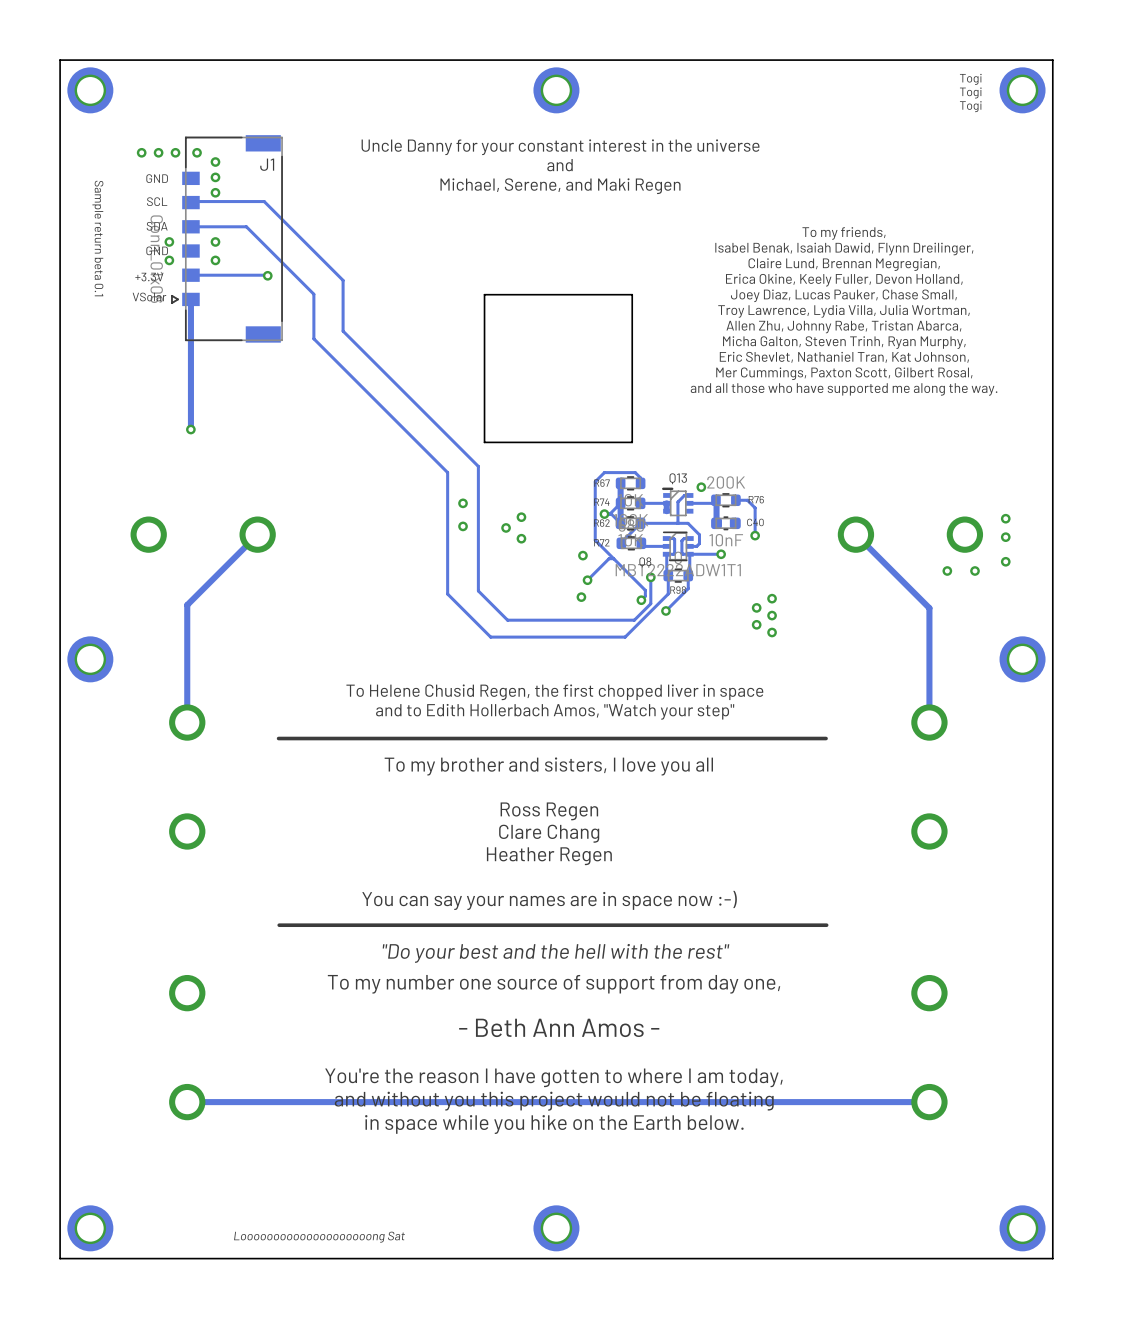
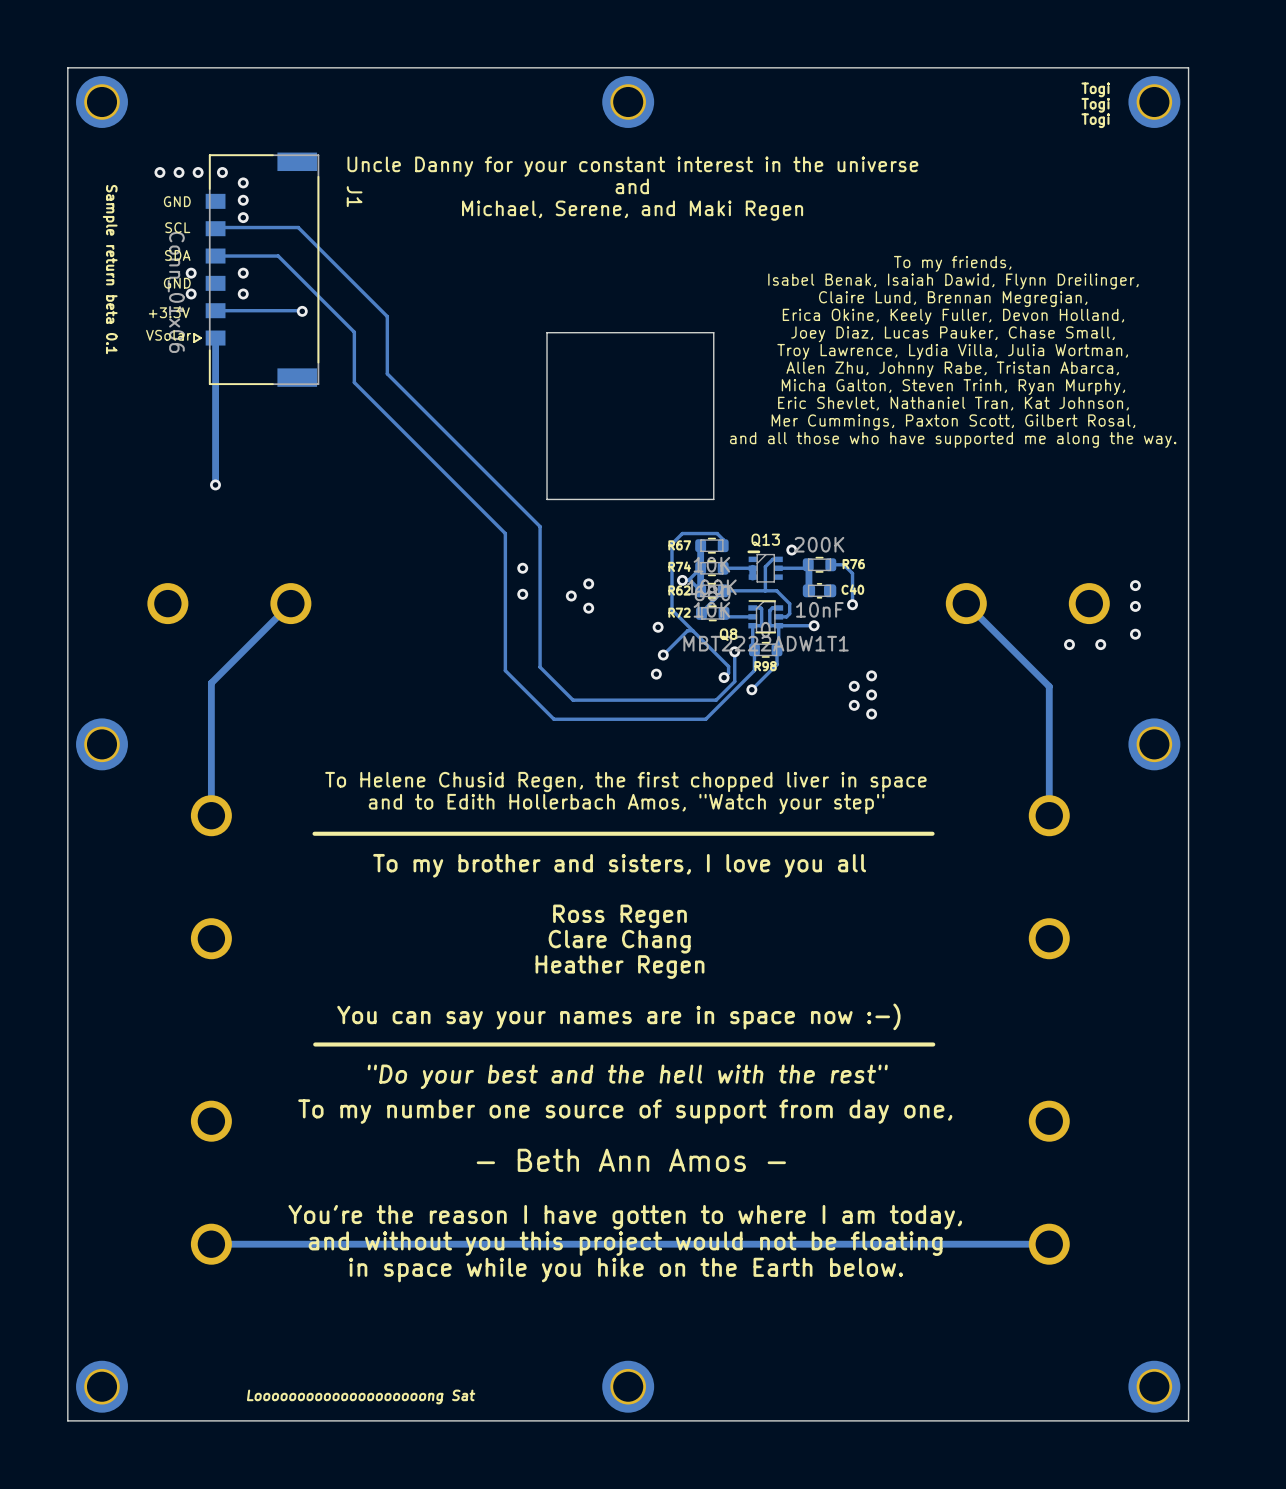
J1 name rotation: 0° (267, 164) -> 90° clockwise (354, 196)
J1 name position: J1 (267, 164) -> J1 (354, 196)

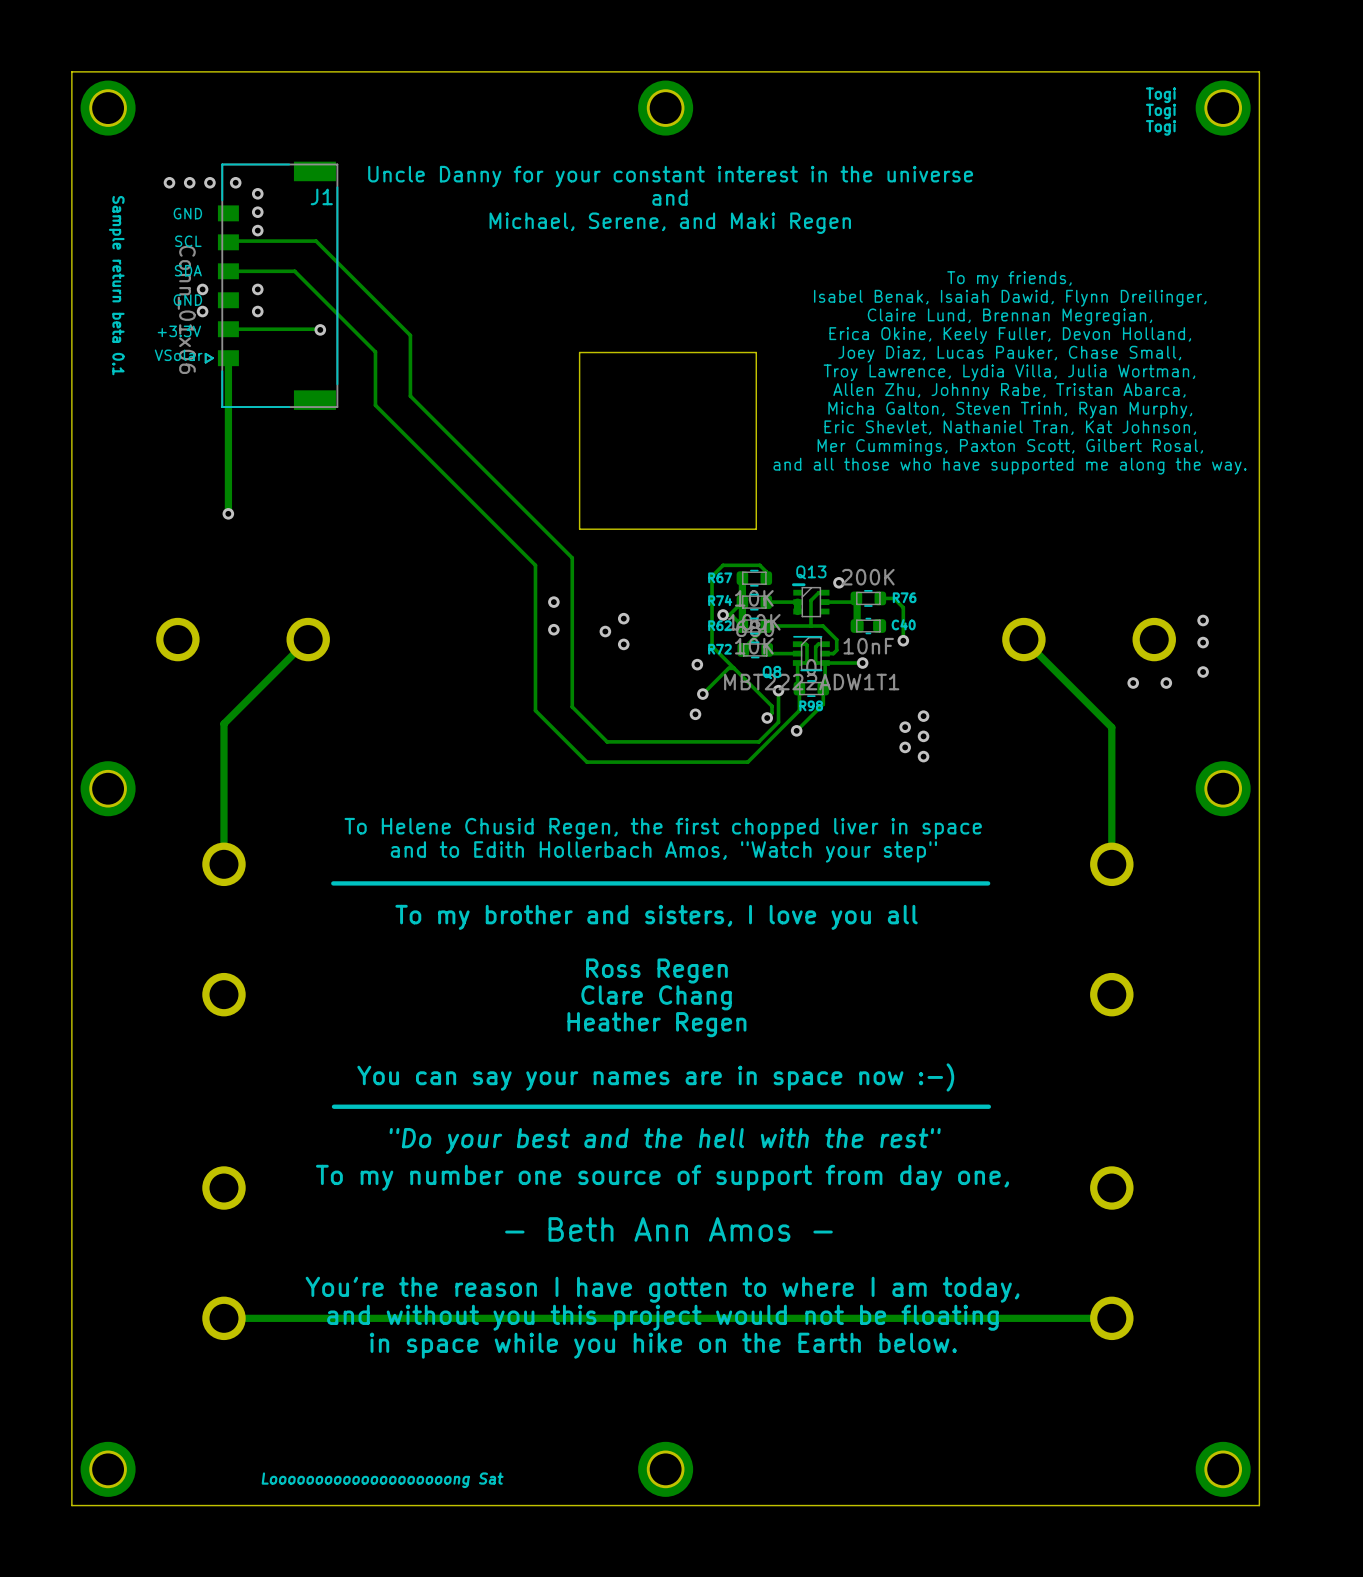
J1 name rotation: 0° (354, 196) -> 90° counterclockwise (321, 196)
J1 name position: J1 (354, 196) -> J1 (321, 196)

